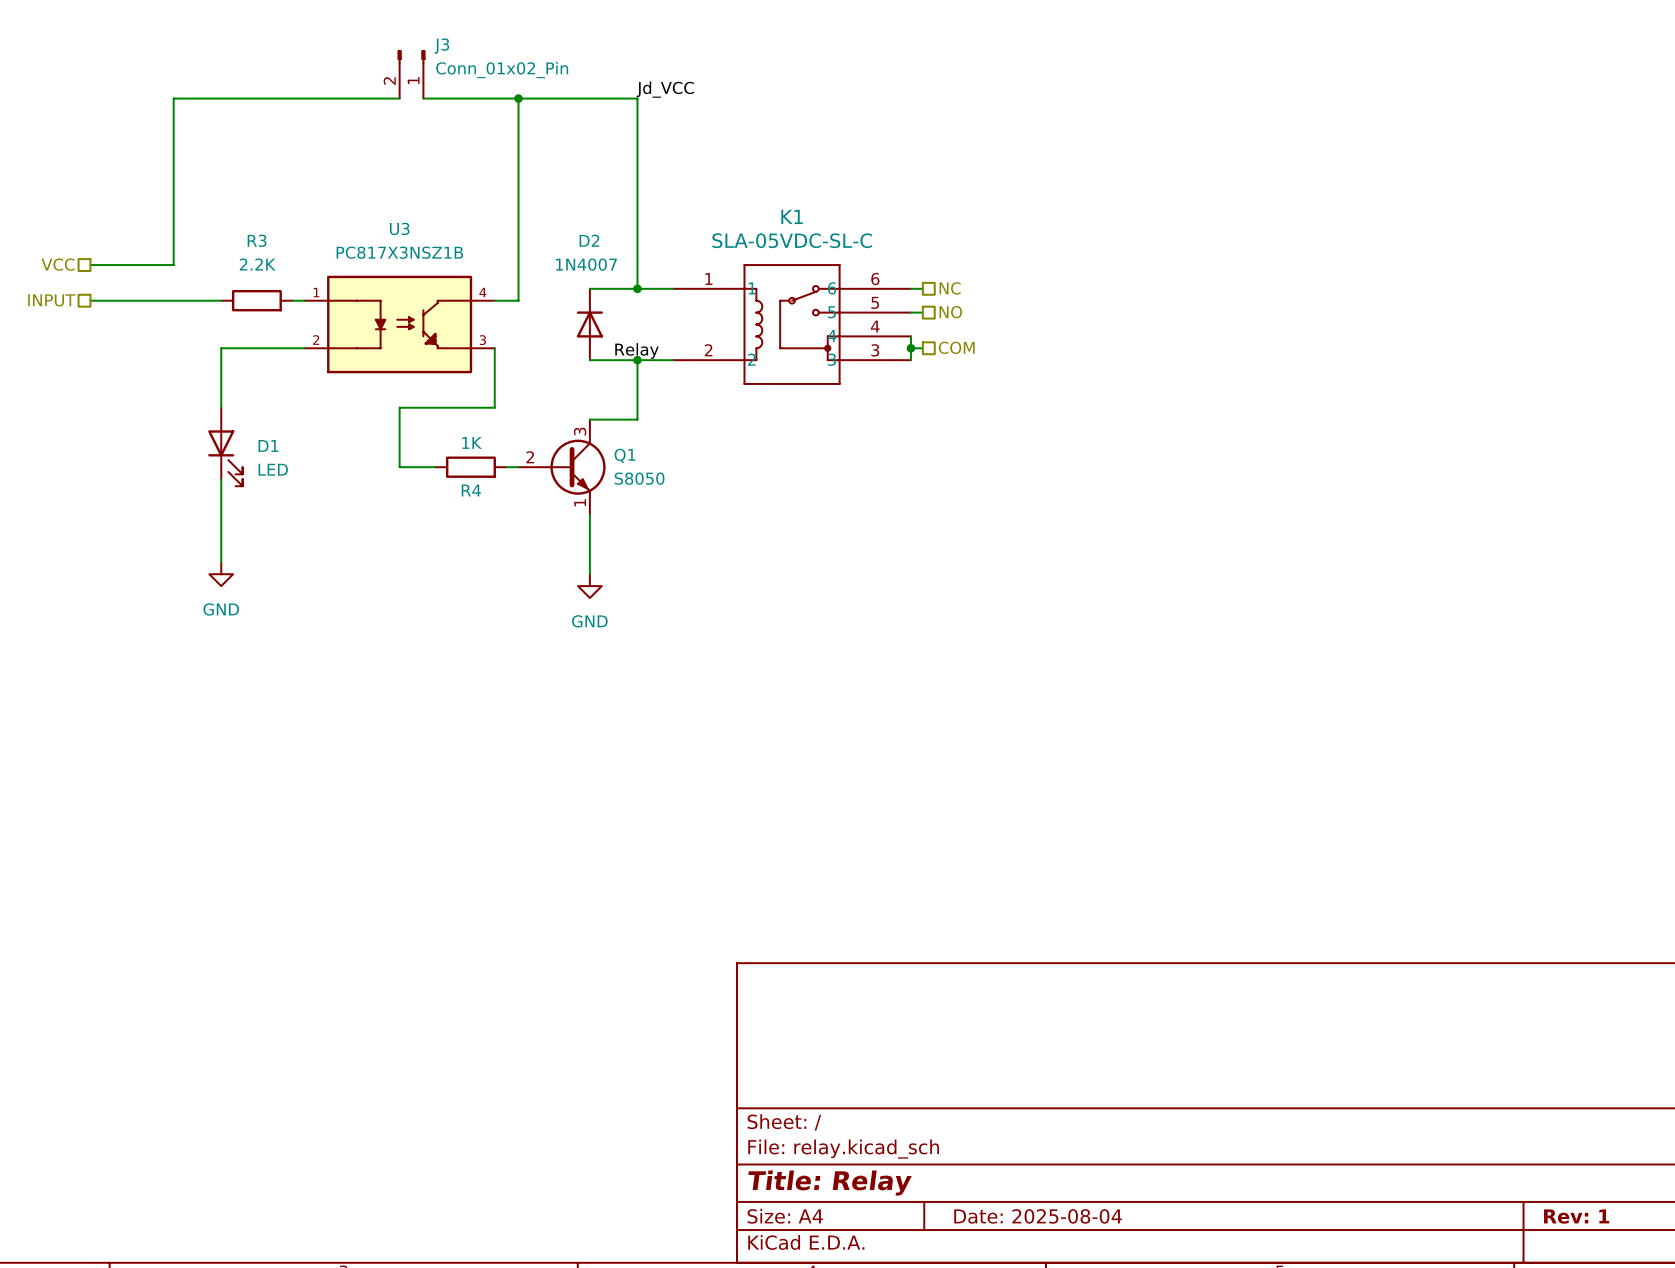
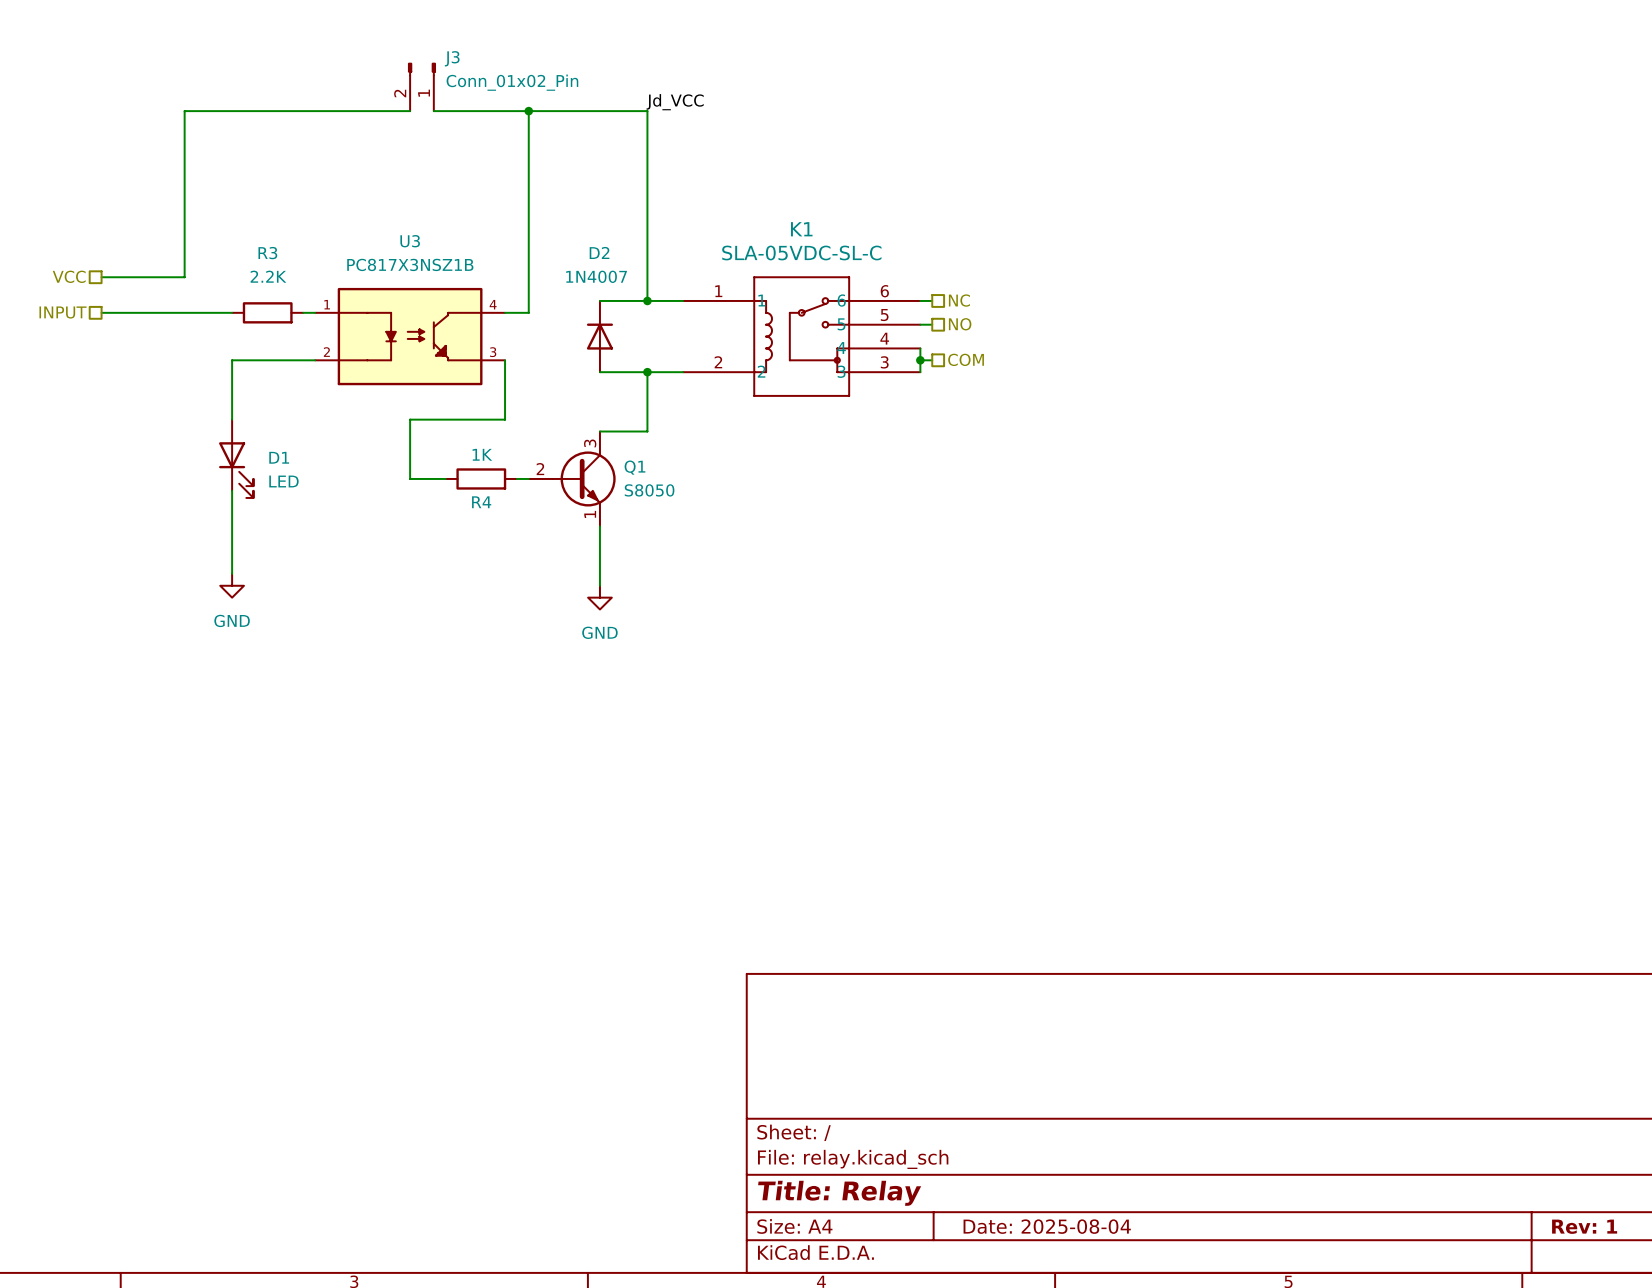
label: Relay (637, 351) -> none

